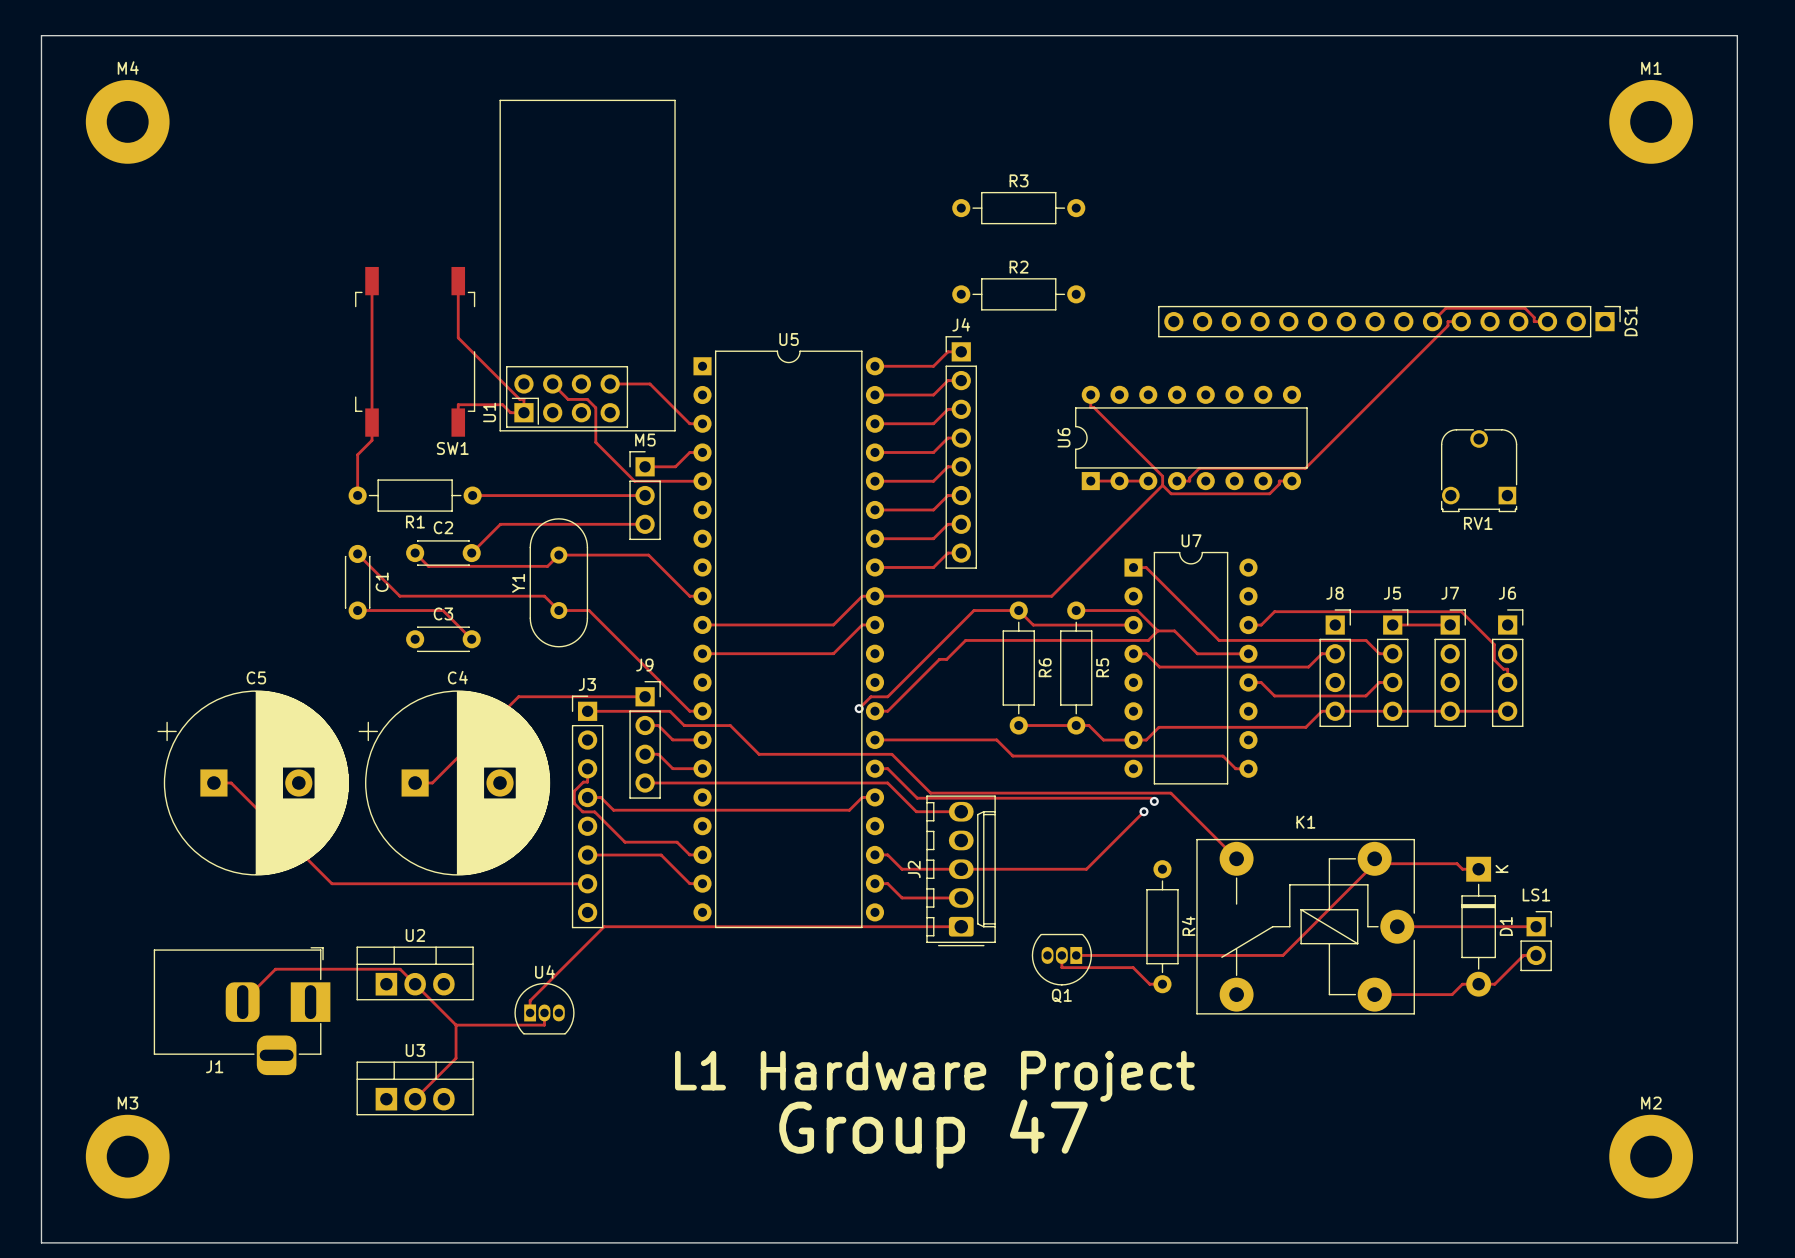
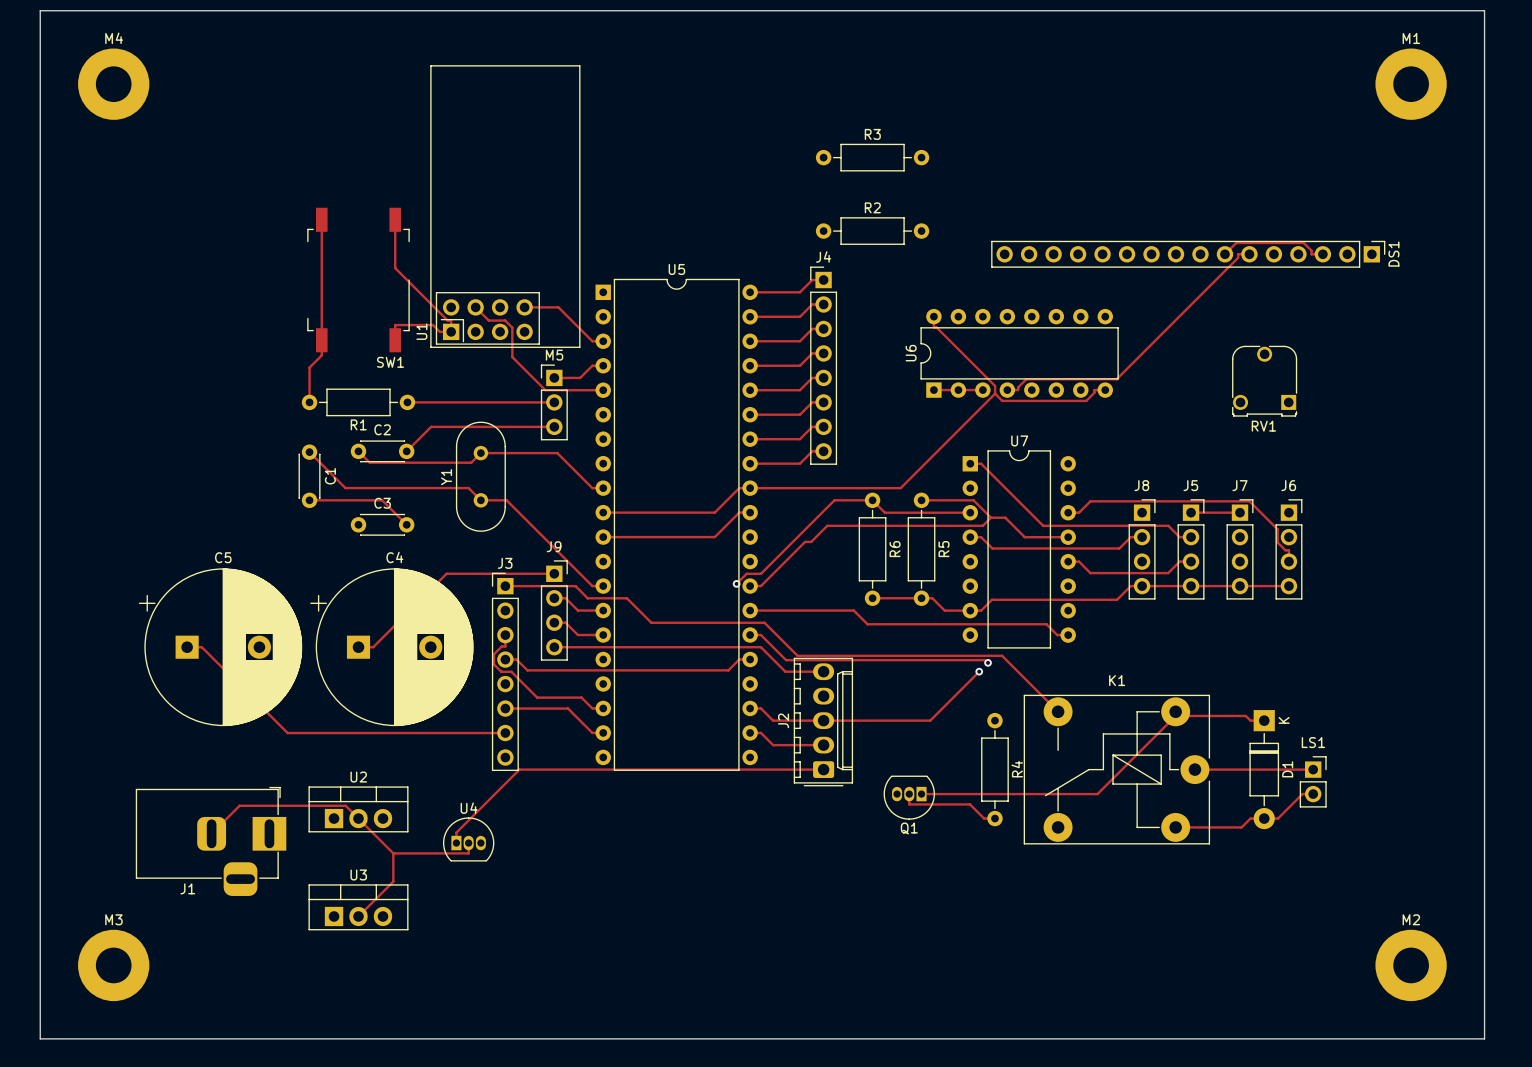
text: L1 Hardware Project (934, 1076) -> none
text: Group 47 (933, 1134) -> none

